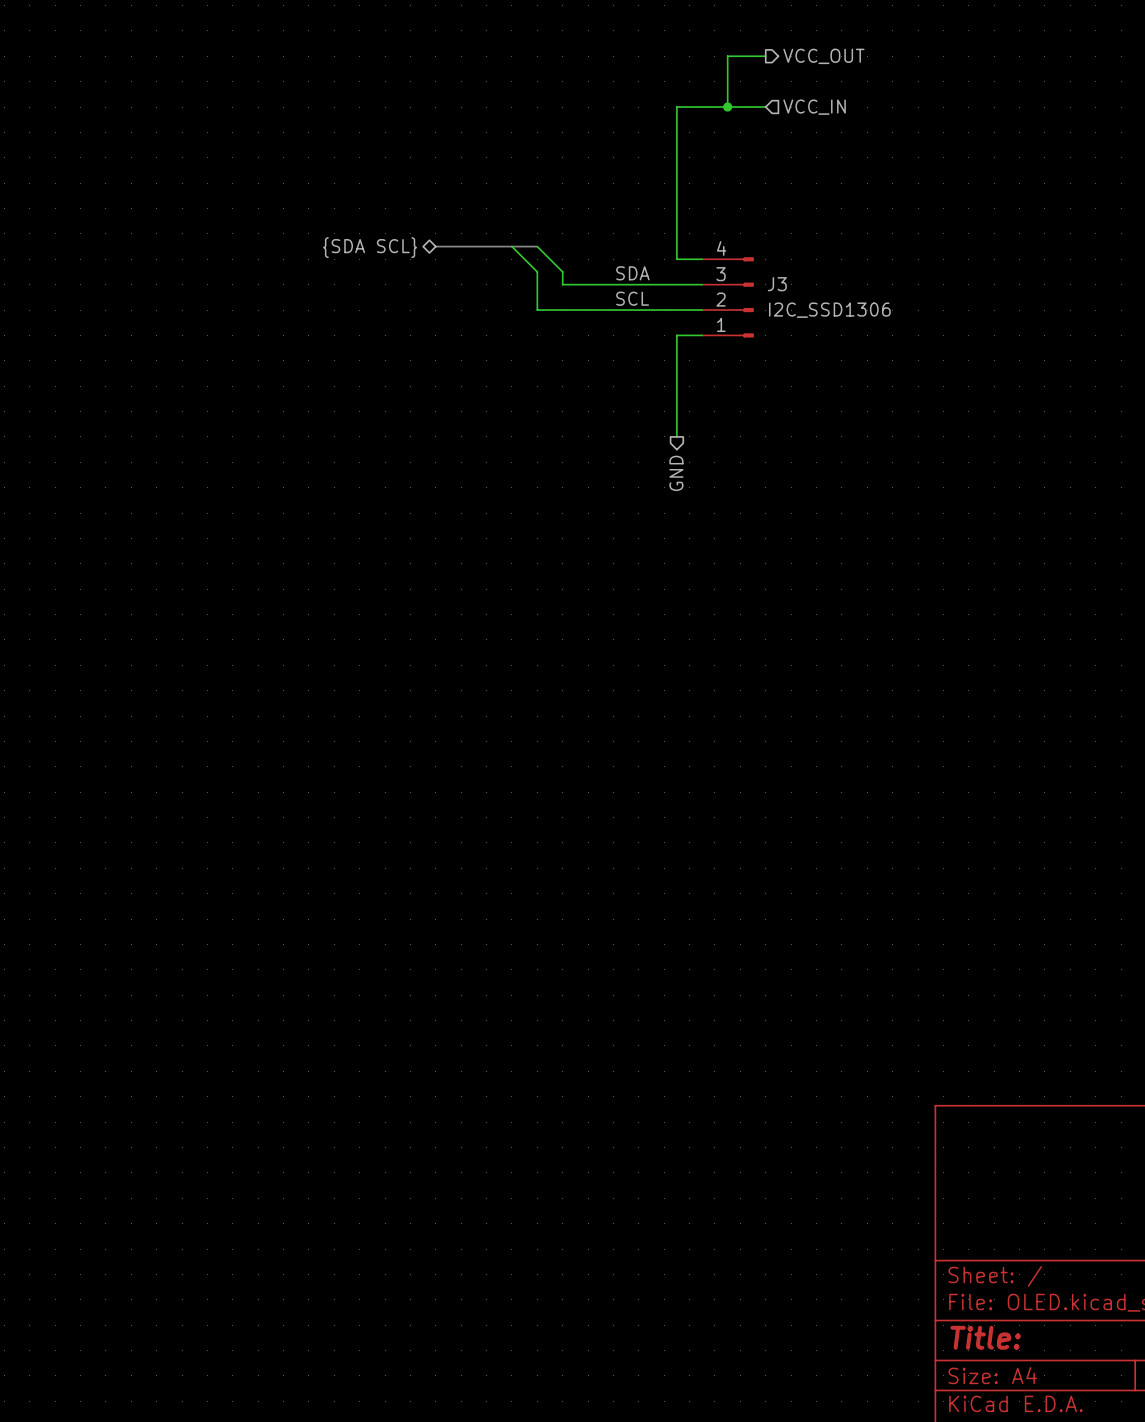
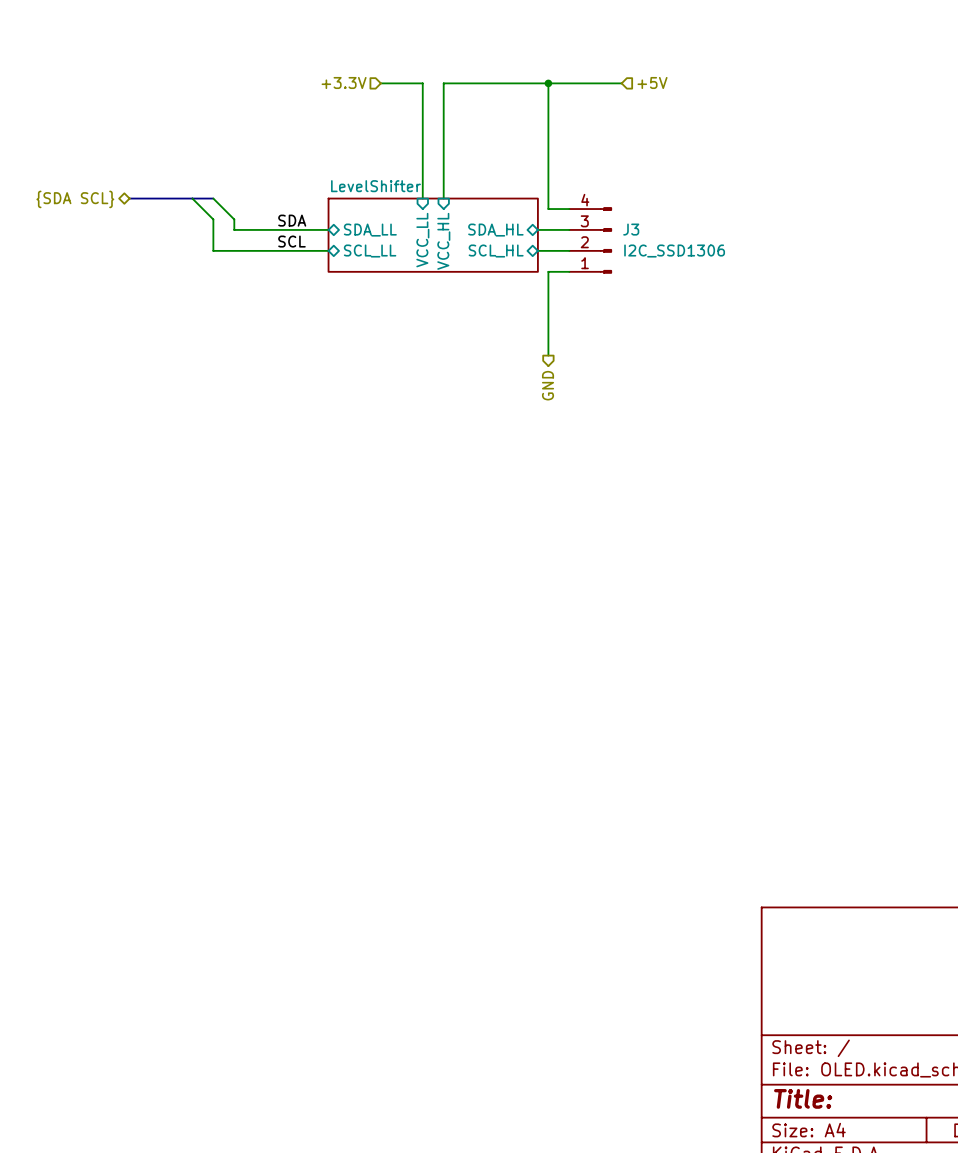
wire: (765, 56) (727, 56) (727, 107) -> none
hierarchical label: VCC_OUT (823, 56) -> none
hierarchical label: none -> +3.3V (344, 82)
wire: none -> (380, 83) (422, 83) (422, 198)
wire: none -> (548, 83) (443, 83) (443, 198)
junction position: (727, 107) -> (548, 83)
hierarchical label: VCC_IN (814, 107) -> +5V (652, 82)
bus: none -> (129, 198) (213, 198)
wire: none -> (192, 198) (213, 219) (213, 250) (328, 250)
wire: none -> (213, 198) (234, 219) (234, 229) (328, 229)
bus: (435, 246) (537, 246) -> none
wire: (511, 246) (537, 271) (537, 310) (664, 310) -> none
wire: (537, 246) (562, 271) (562, 284) (664, 284) -> none
hierarchical label: none -> {SDA SCL} (75, 199)
hierarchical label: {SDA SCL} (370, 247) -> none
label: none -> SDA (292, 220)
label: SDA (632, 273) -> none
sheet pin: none -> SDA_LL (370, 230)
sheet pin: none -> SDA_HL (495, 230)
sheet LevelShifter: none -> (433, 235)
sheet pin: none -> VCC_LL (422, 240)
label: none -> SCL (291, 241)
sheet pin: none -> VCC_HL (443, 241)
label: SCL (632, 298) -> none
sheet pin: none -> SCL_LL (370, 251)
sheet pin: none -> SCL_HL (496, 251)

